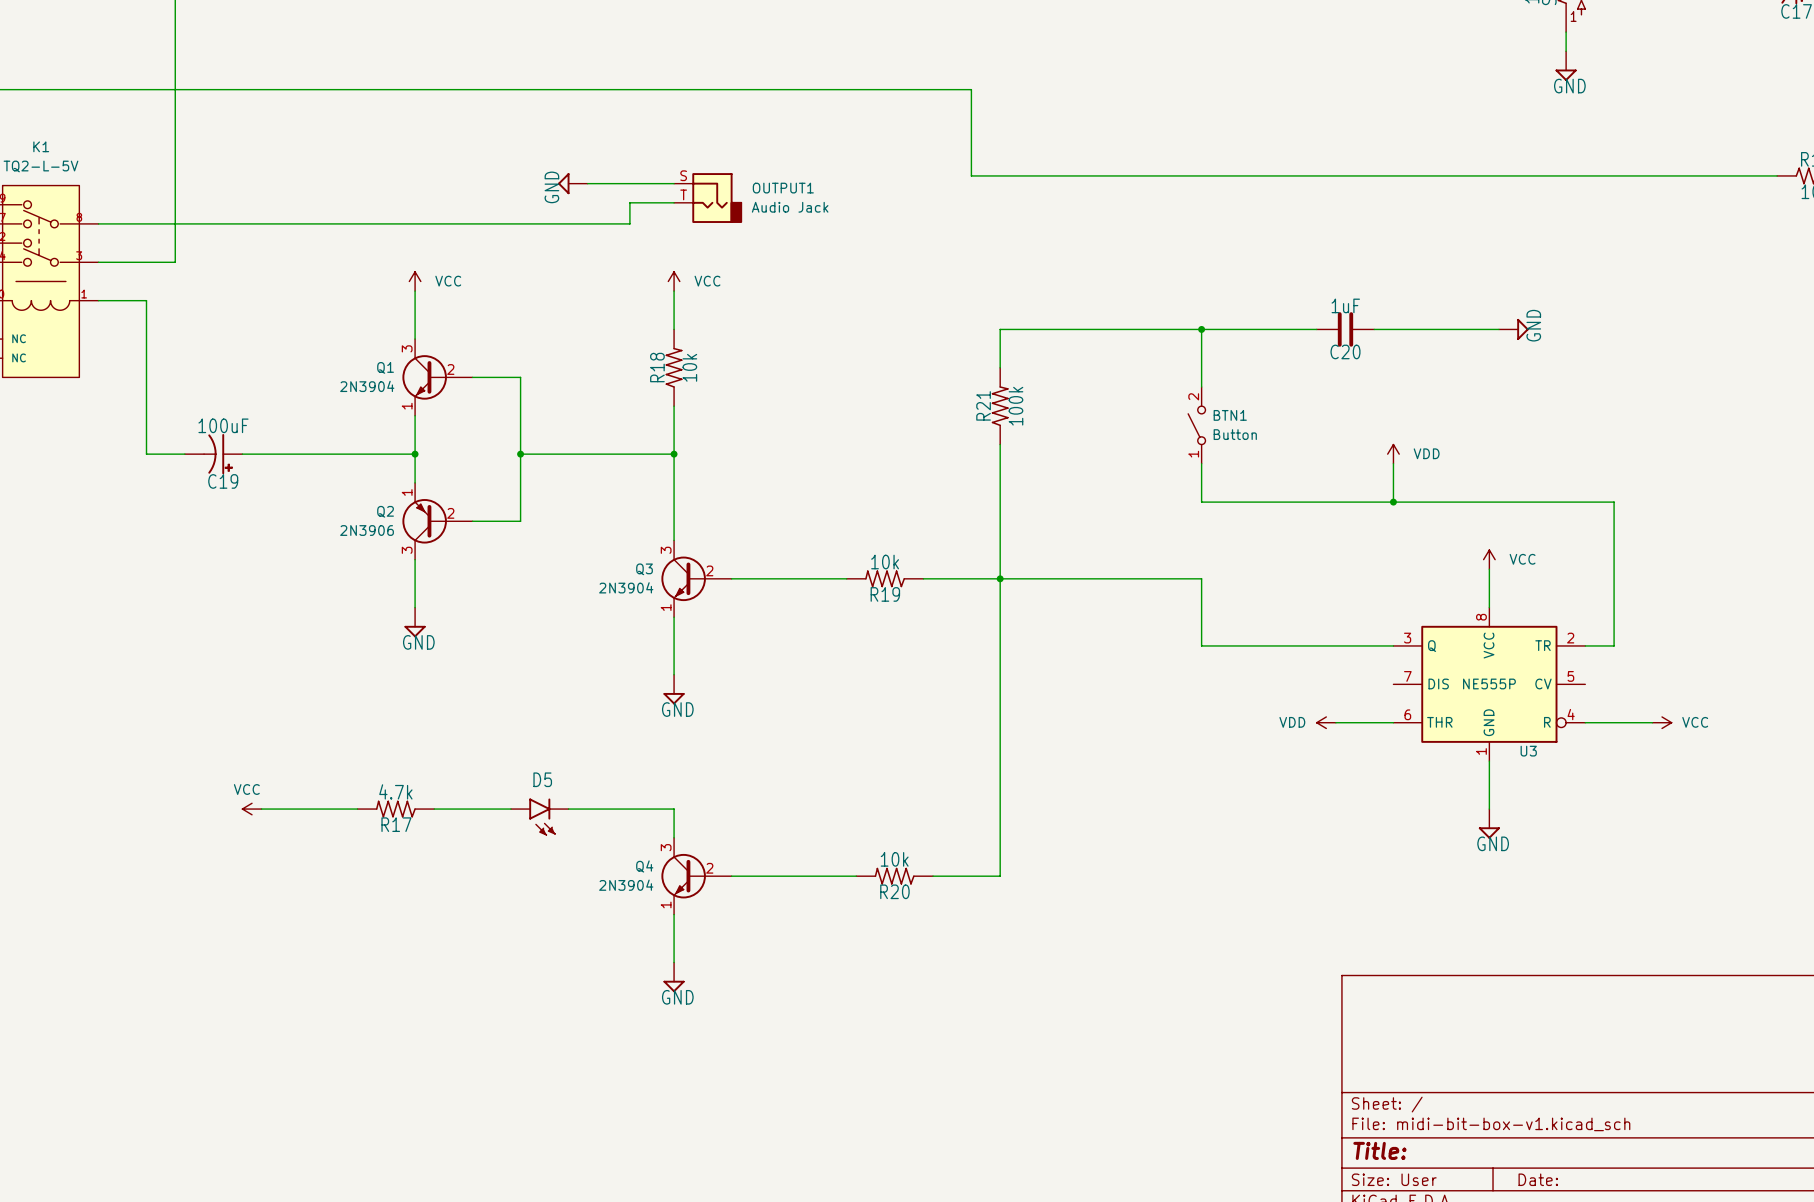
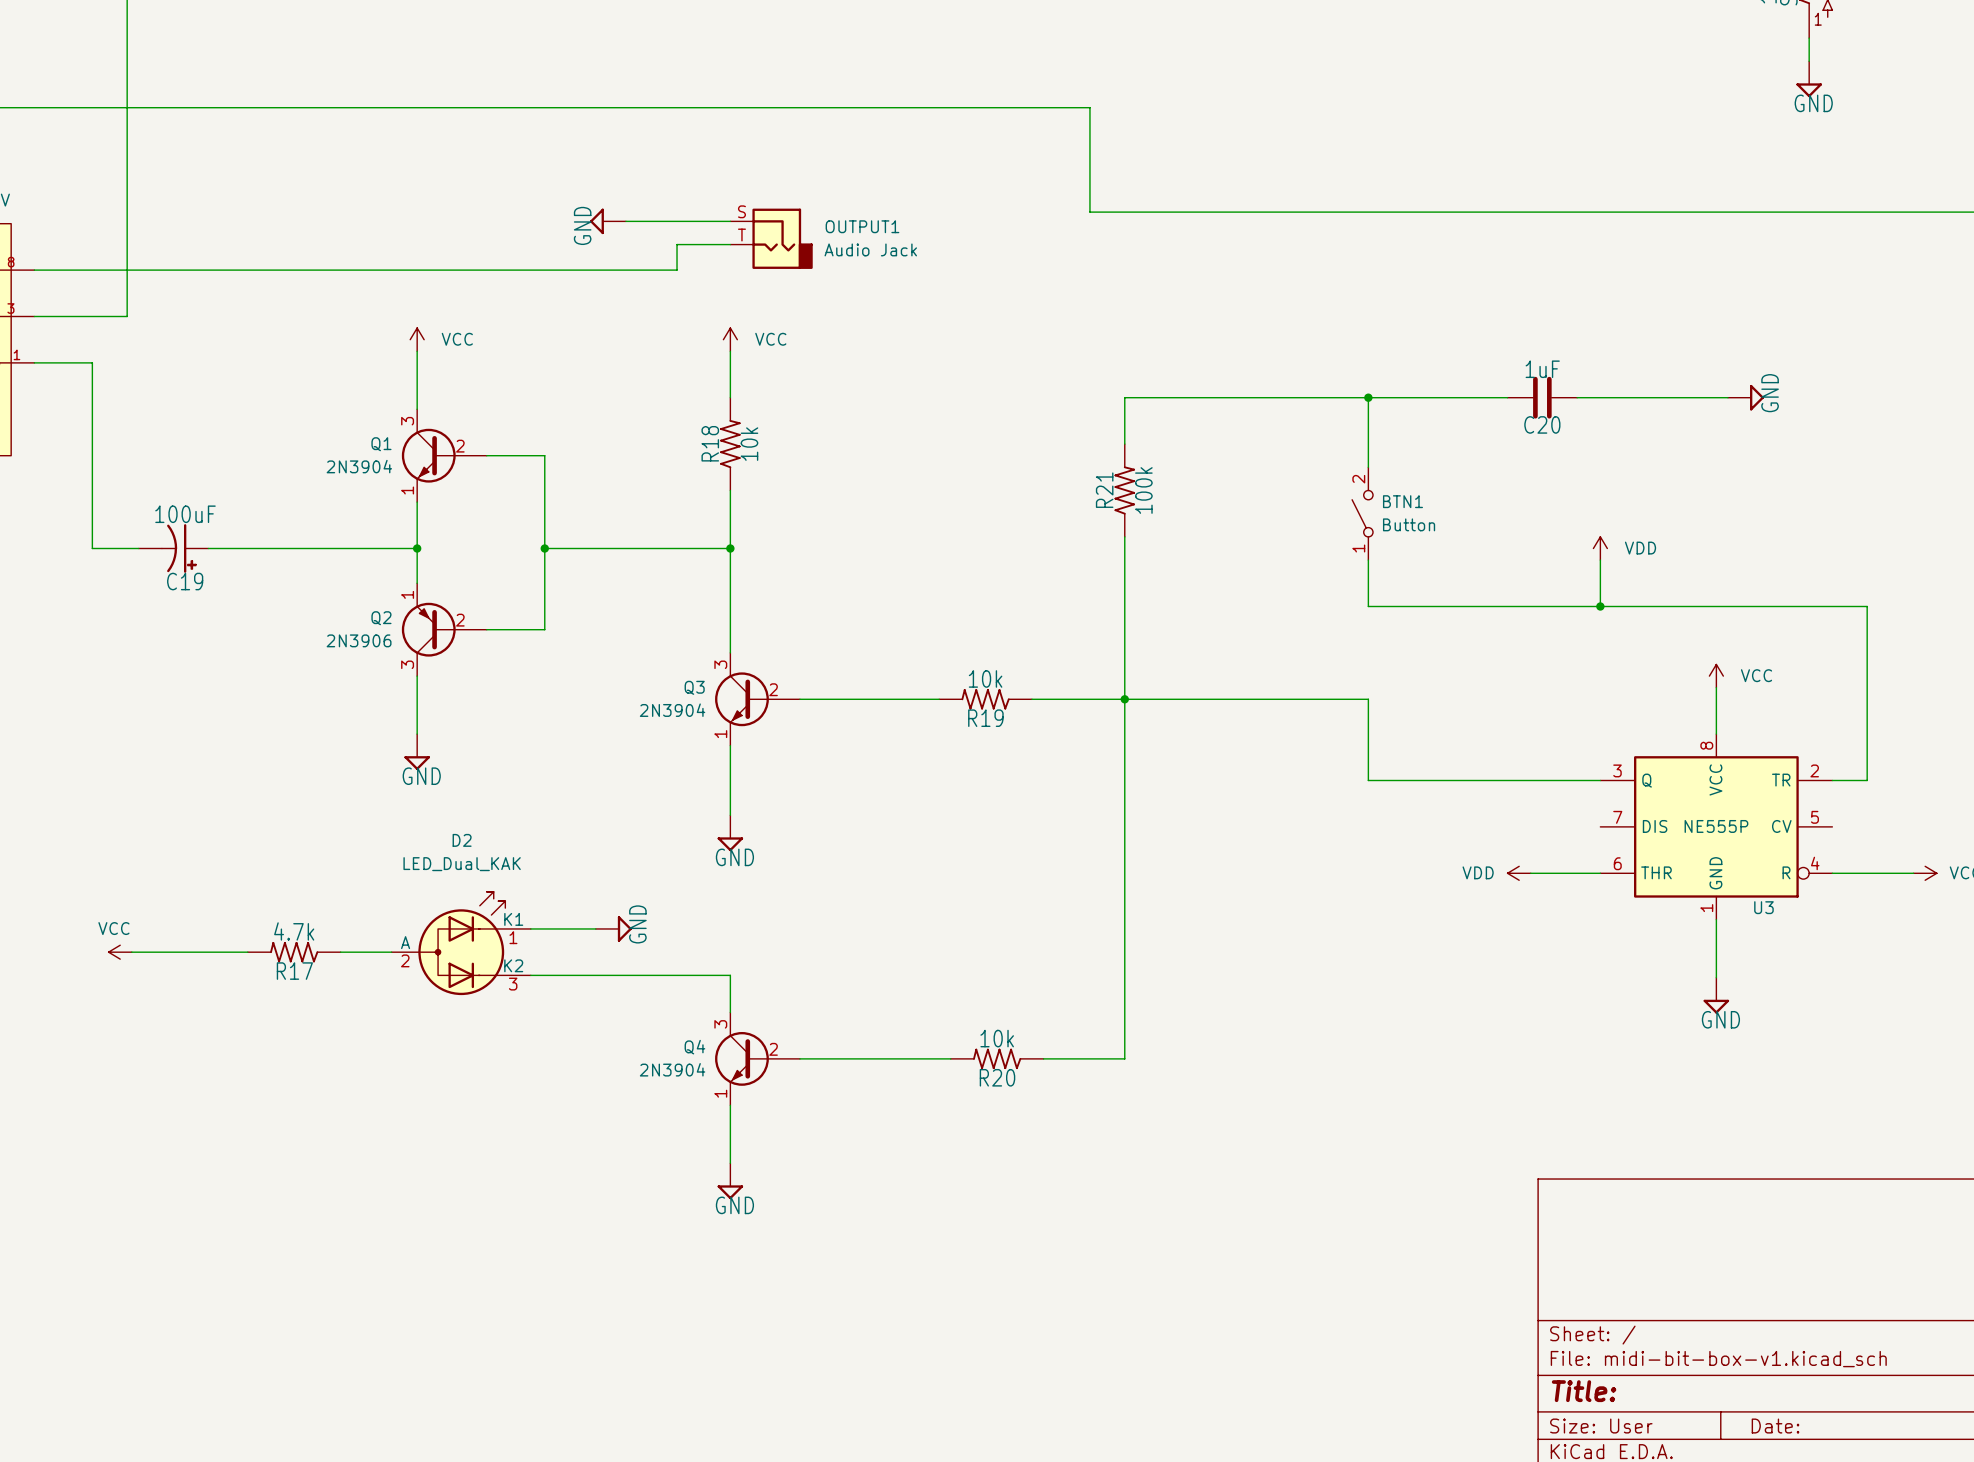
wire: none -> (530, 928) (595, 928)
power symbol: none -> GND (613, 928)
D2: none -> LED_Dual_KAK (461, 943)
wire: none -> (340, 952) (391, 952)
power symbol position: VCC (252, 809) -> VCC (120, 952)
wire: (261, 809) (357, 809) -> (131, 952) (247, 952)
R17 position: (395, 809) -> (294, 952)
wire: (568, 809) (674, 809) -> (530, 975) (730, 975) (730, 977)
D5: (539, 817) -> none

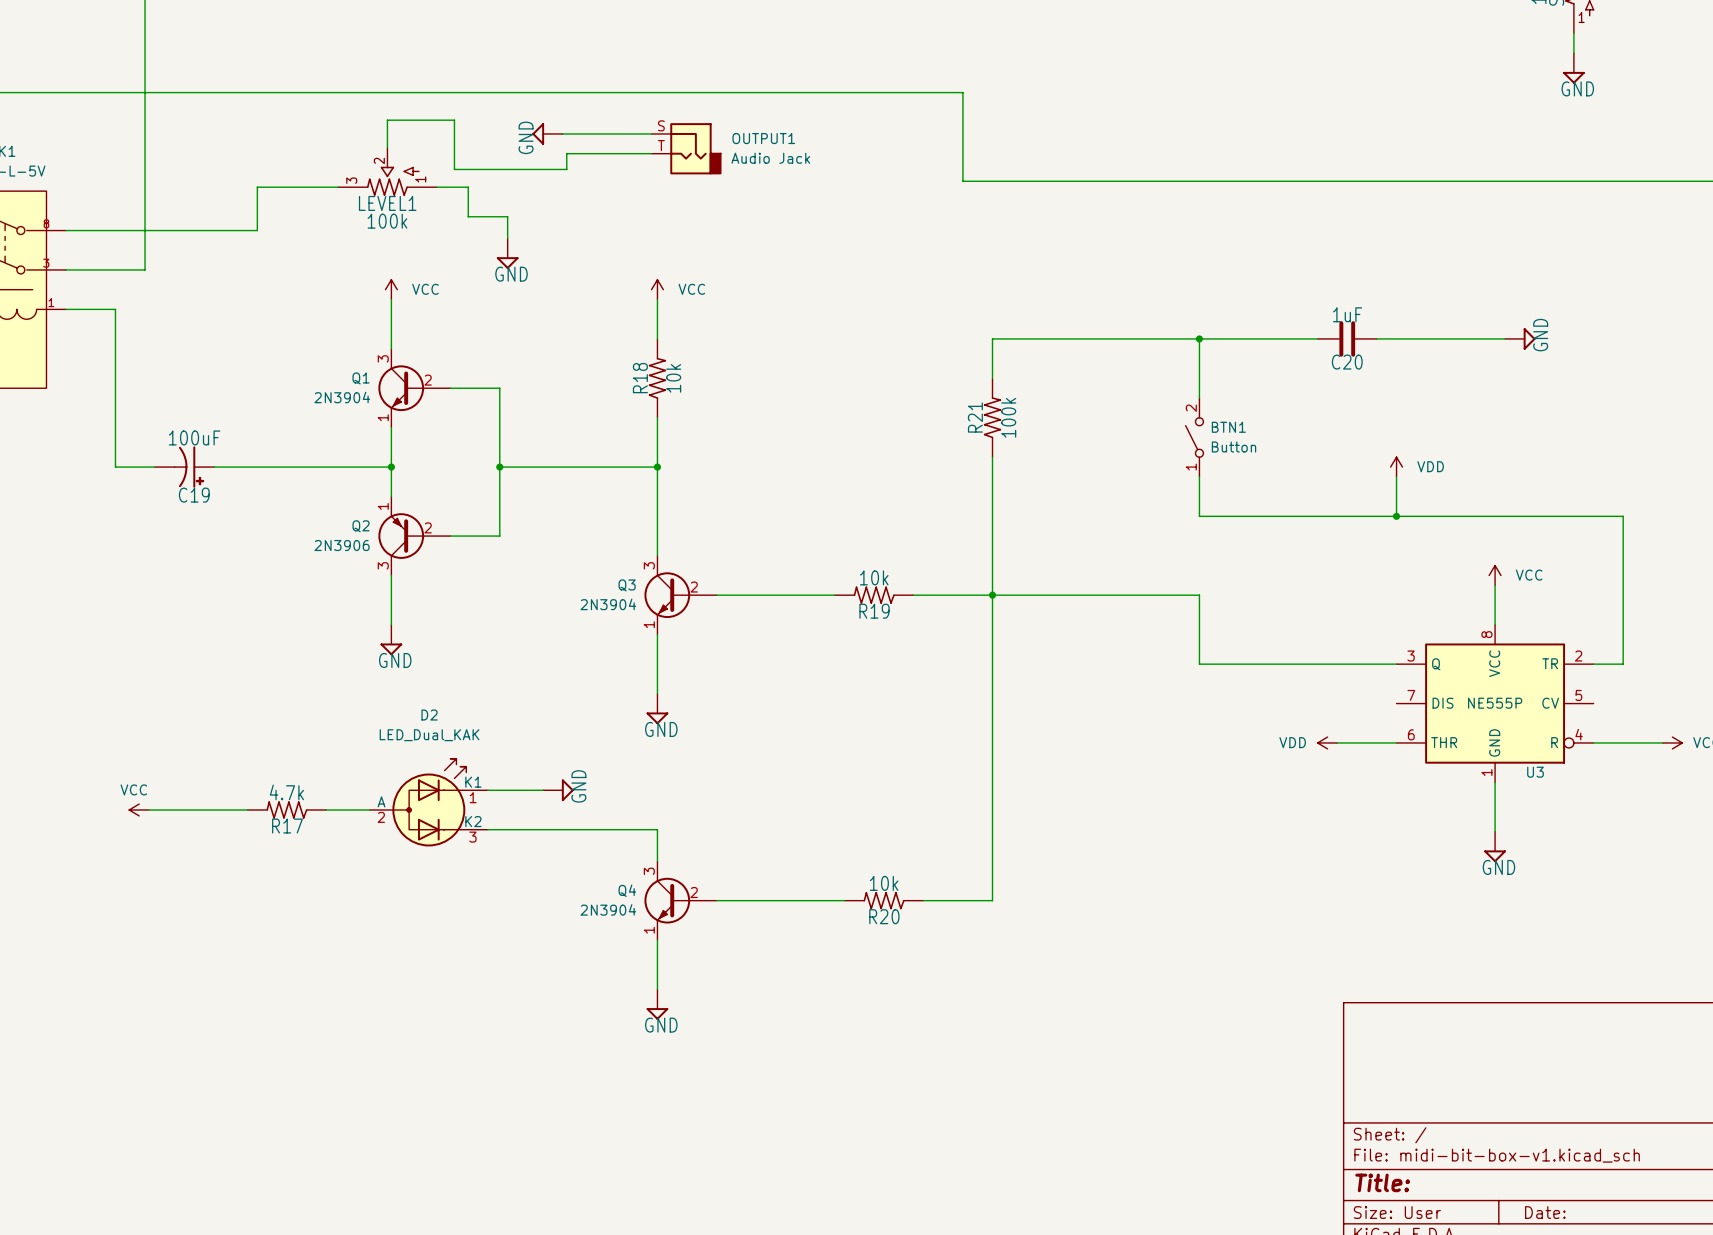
power symbol: none -> GND (547, 133)
wire: none -> (387, 147) (387, 120) (454, 120) (454, 169) (566, 169) (566, 153) (651, 153)
LEVEL1: none -> 100k (387, 171)
wire: none -> (436, 187) (468, 187) (468, 216) (507, 216) (507, 238)
power symbol: GND (607, 221) -> none
wire: (625, 221) (730, 221) -> (562, 133) (651, 133)
OUTPUT1 position: (771, 238) -> (686, 148)
wire: (730, 244) (677, 244) (677, 270) (259, 270) -> (338, 187) (257, 187) (257, 230)
power symbol: none -> GND (507, 253)

